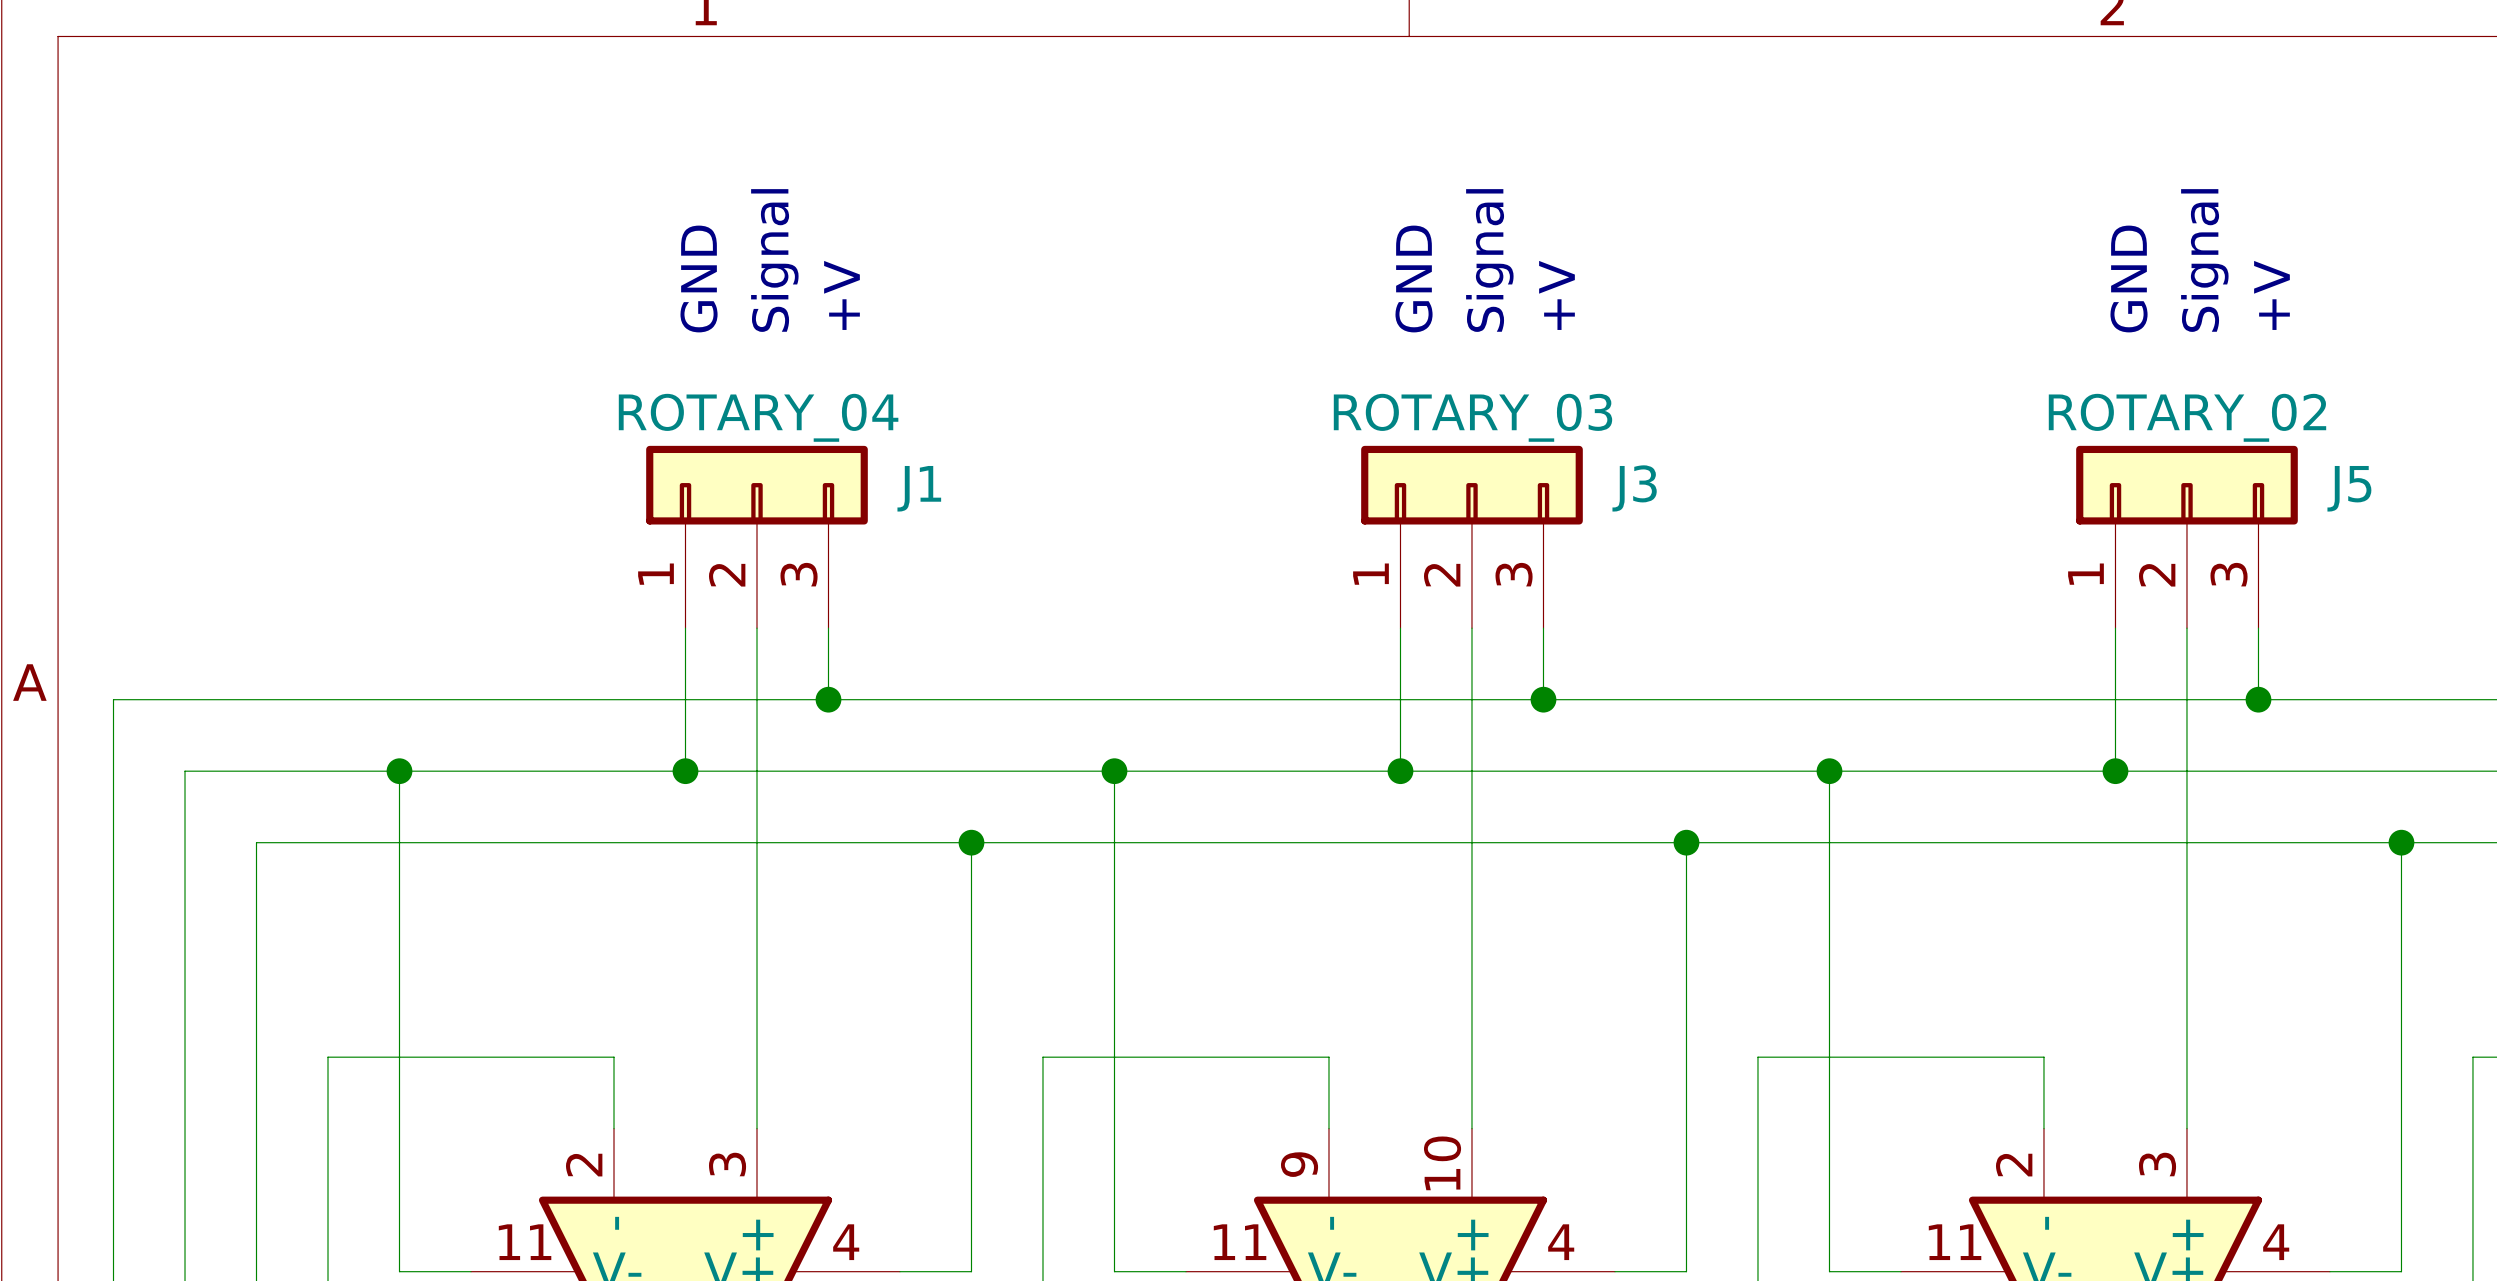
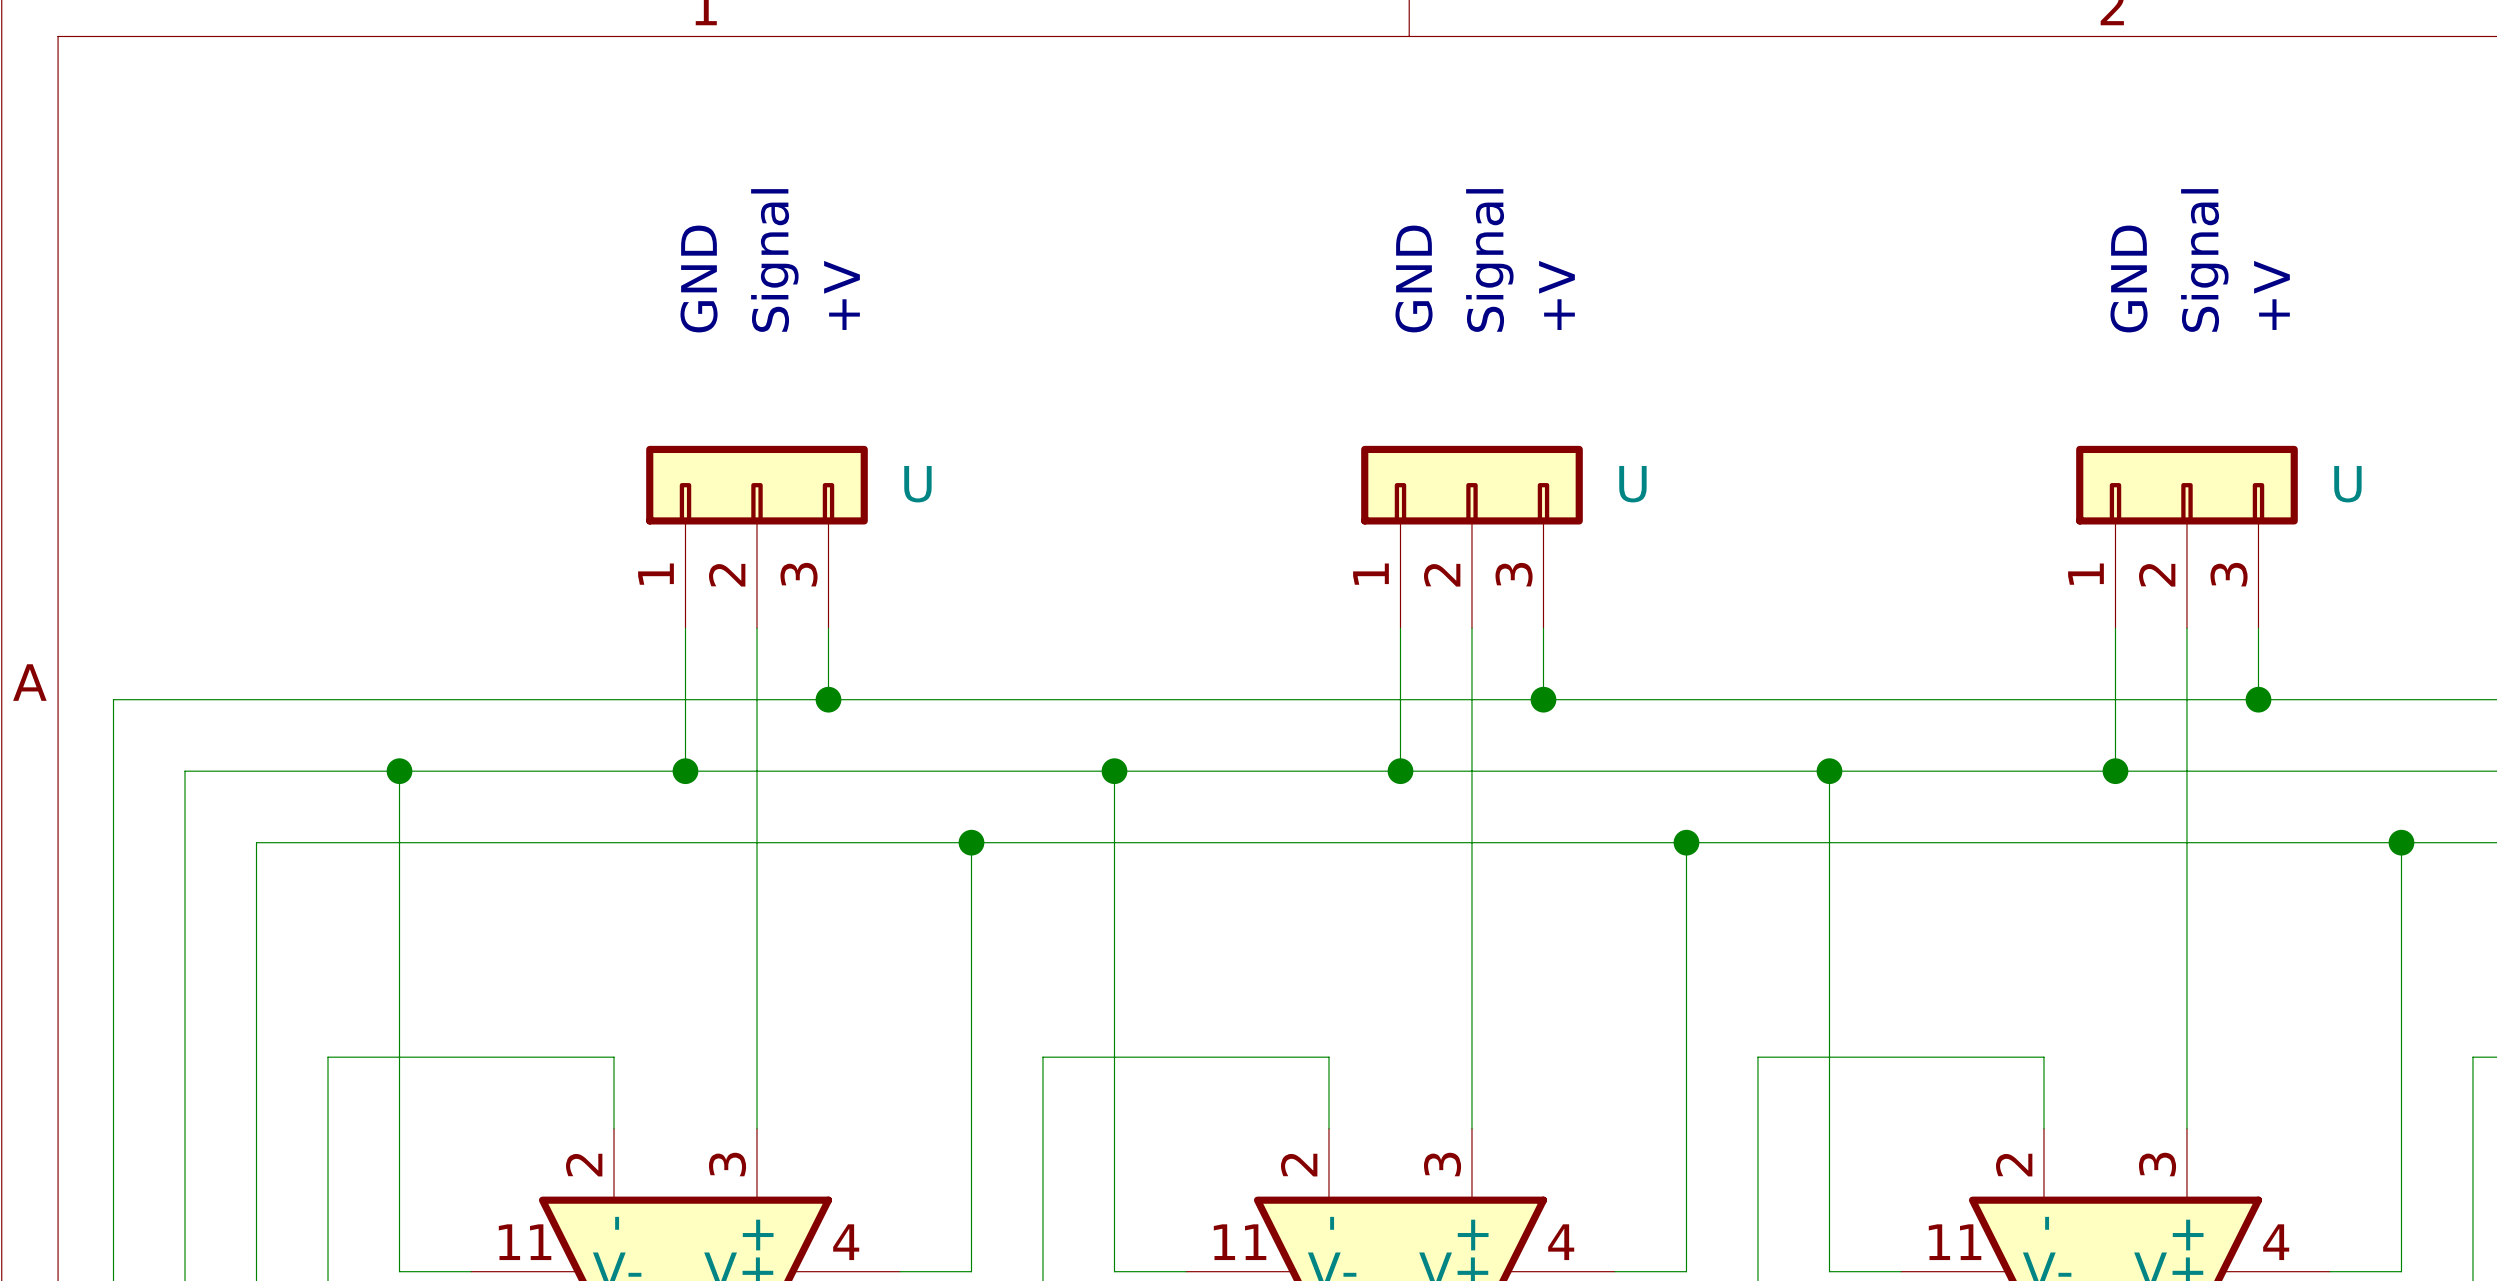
J1 value: ROTARY_04 (758, 417) -> none
J3 value: ROTARY_03 (1472, 417) -> none
J5 value: ROTARY_02 (2187, 417) -> none
J1 name: J1 (919, 488) -> U (917, 484)
J3 name: J3 (1634, 488) -> U (1632, 484)
J5 name: J5 (2349, 488) -> U (2347, 484)
part pin number: 10 (1442, 1163) -> 3 (1442, 1164)
part pin number: 9 (1299, 1164) -> 2 (1299, 1165)

